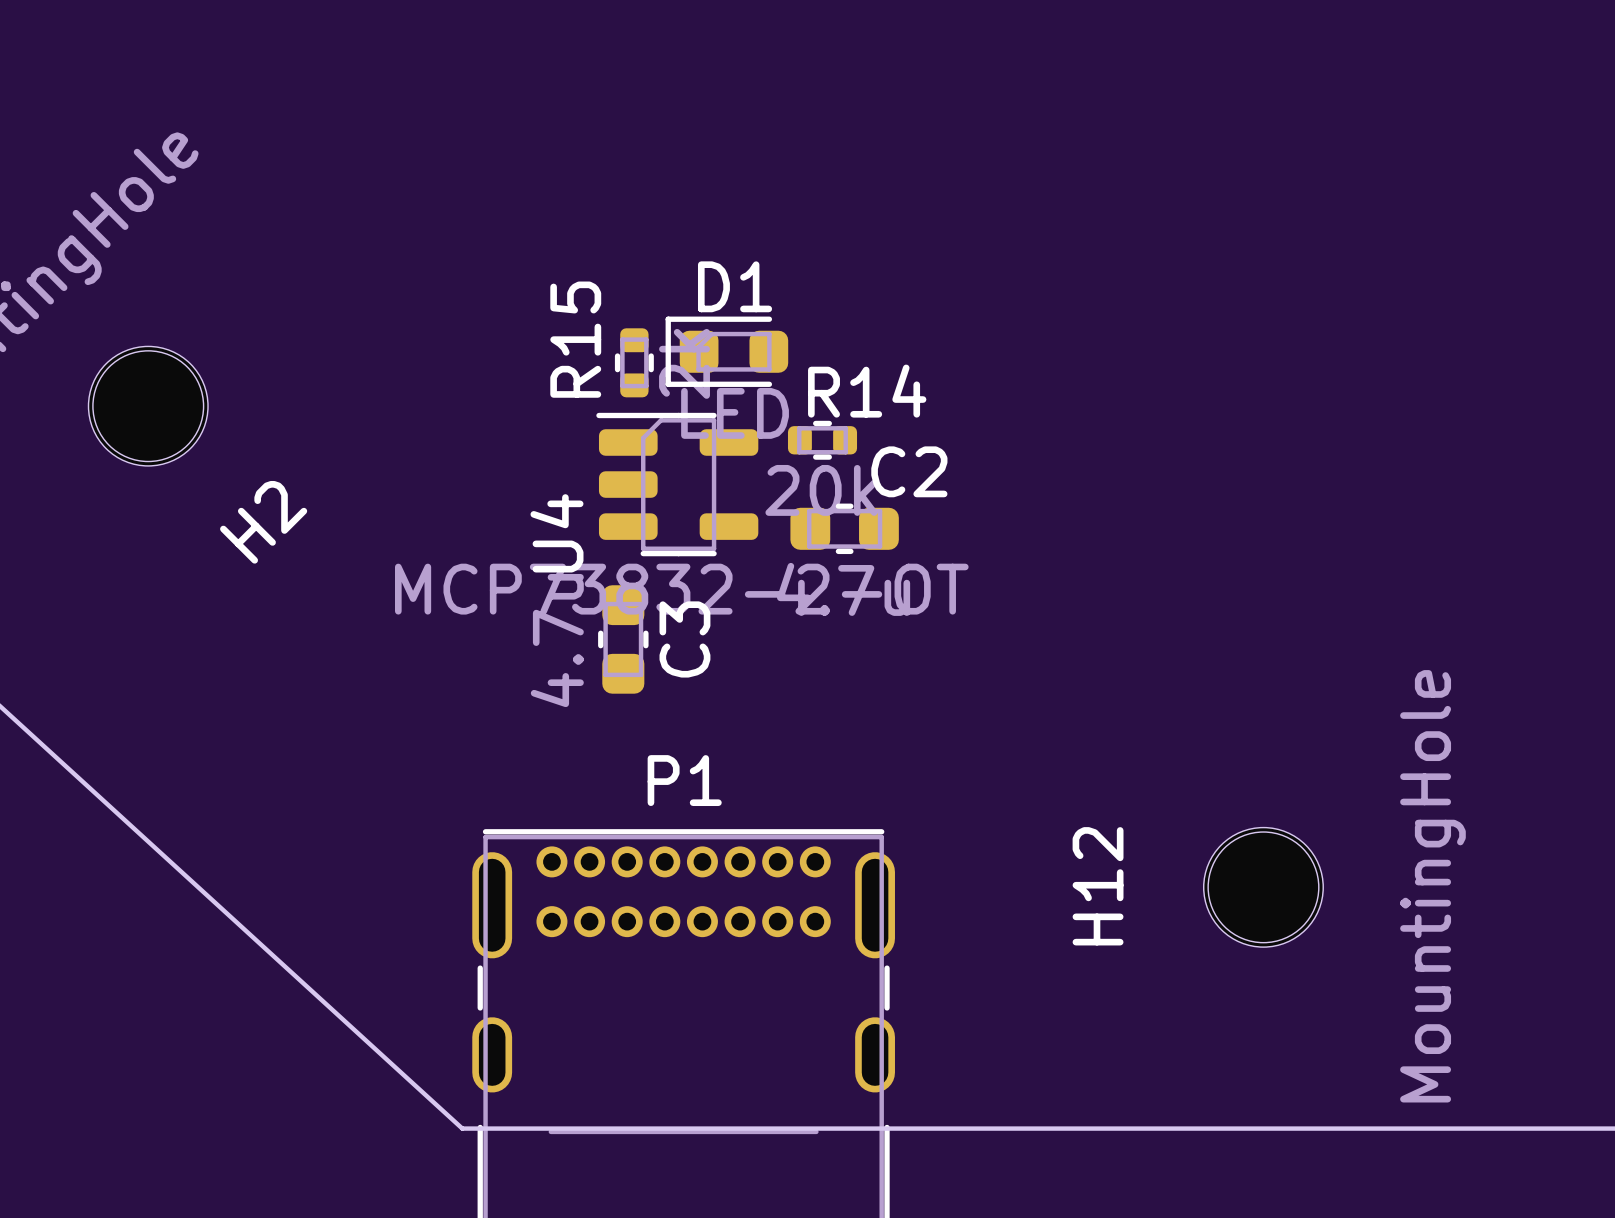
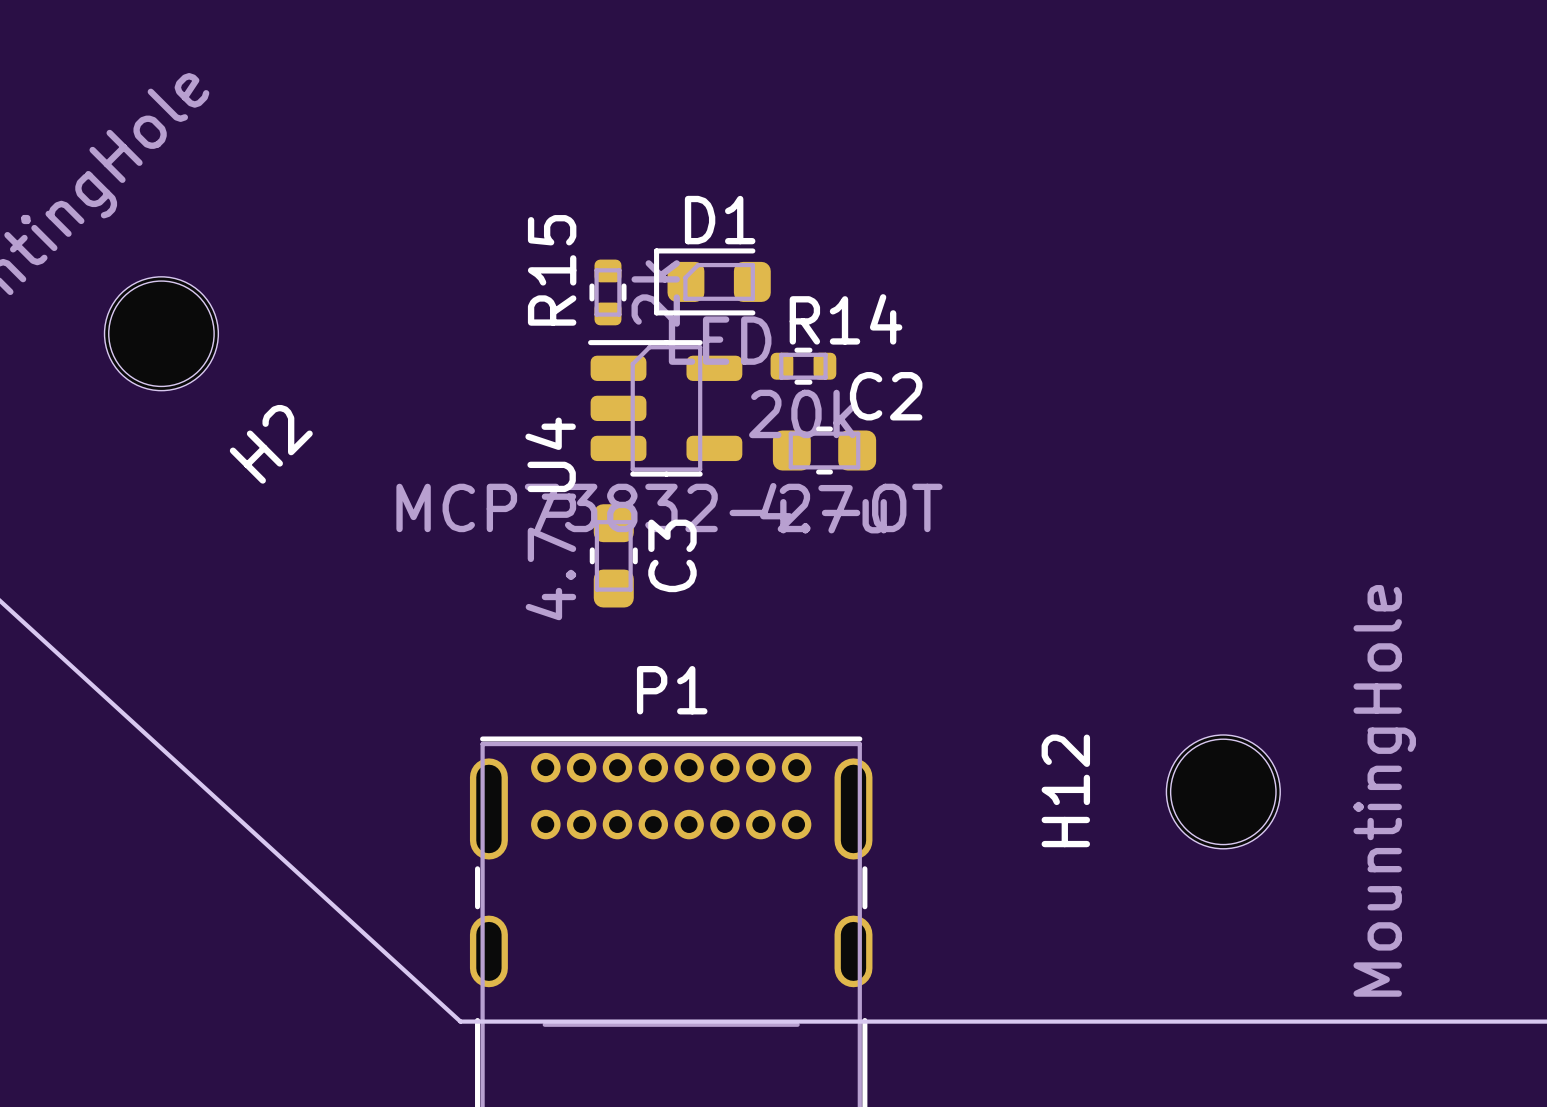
R15 position: (634, 362) -> (607, 292)

